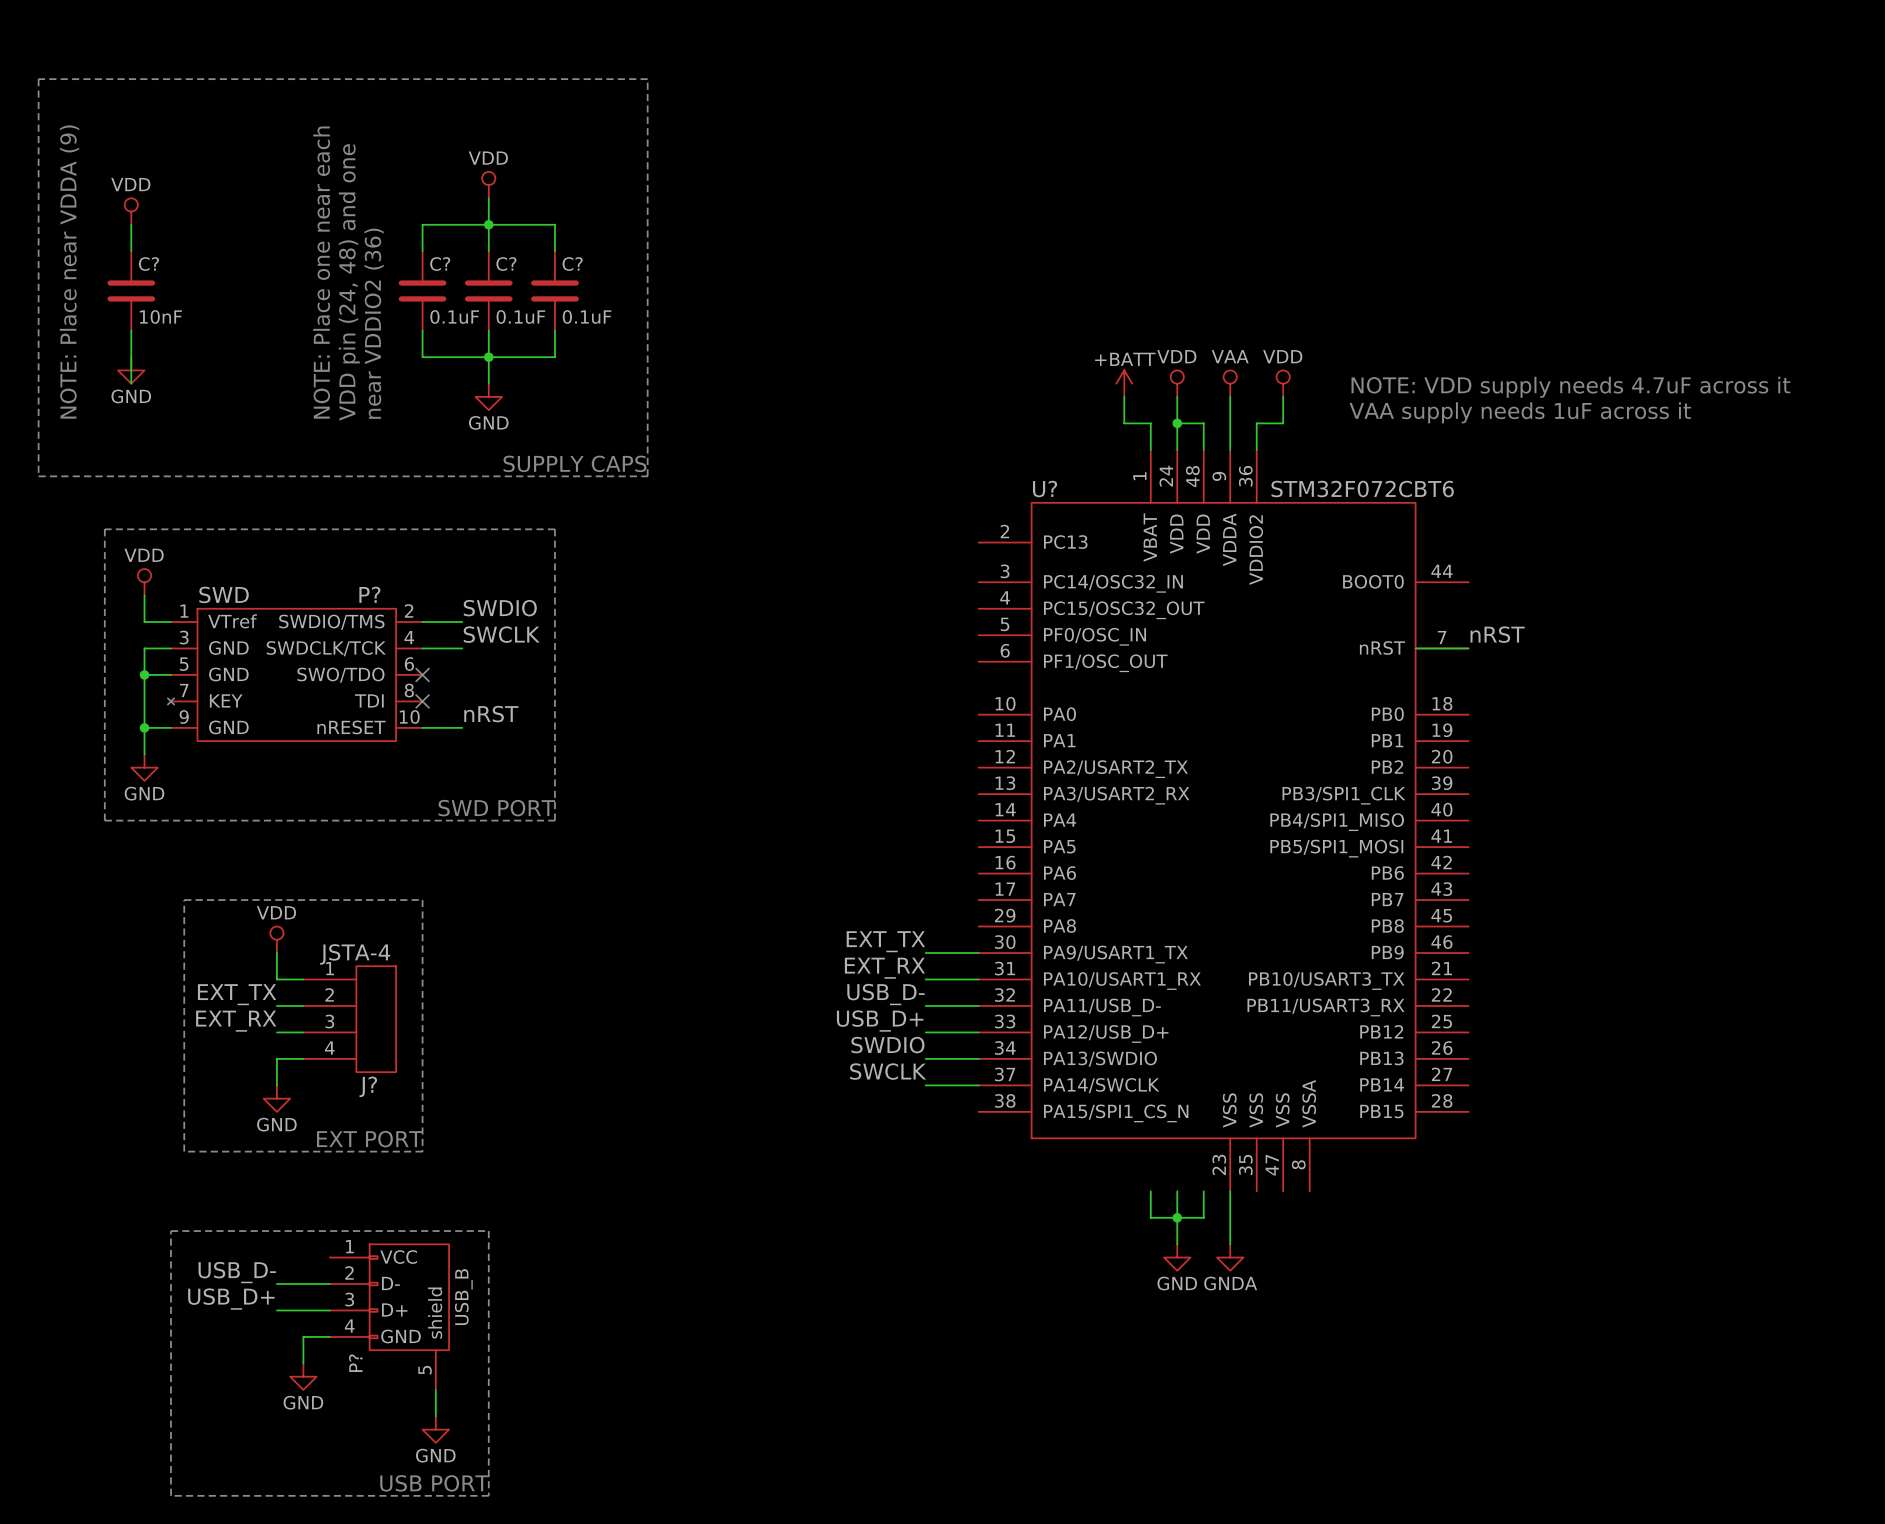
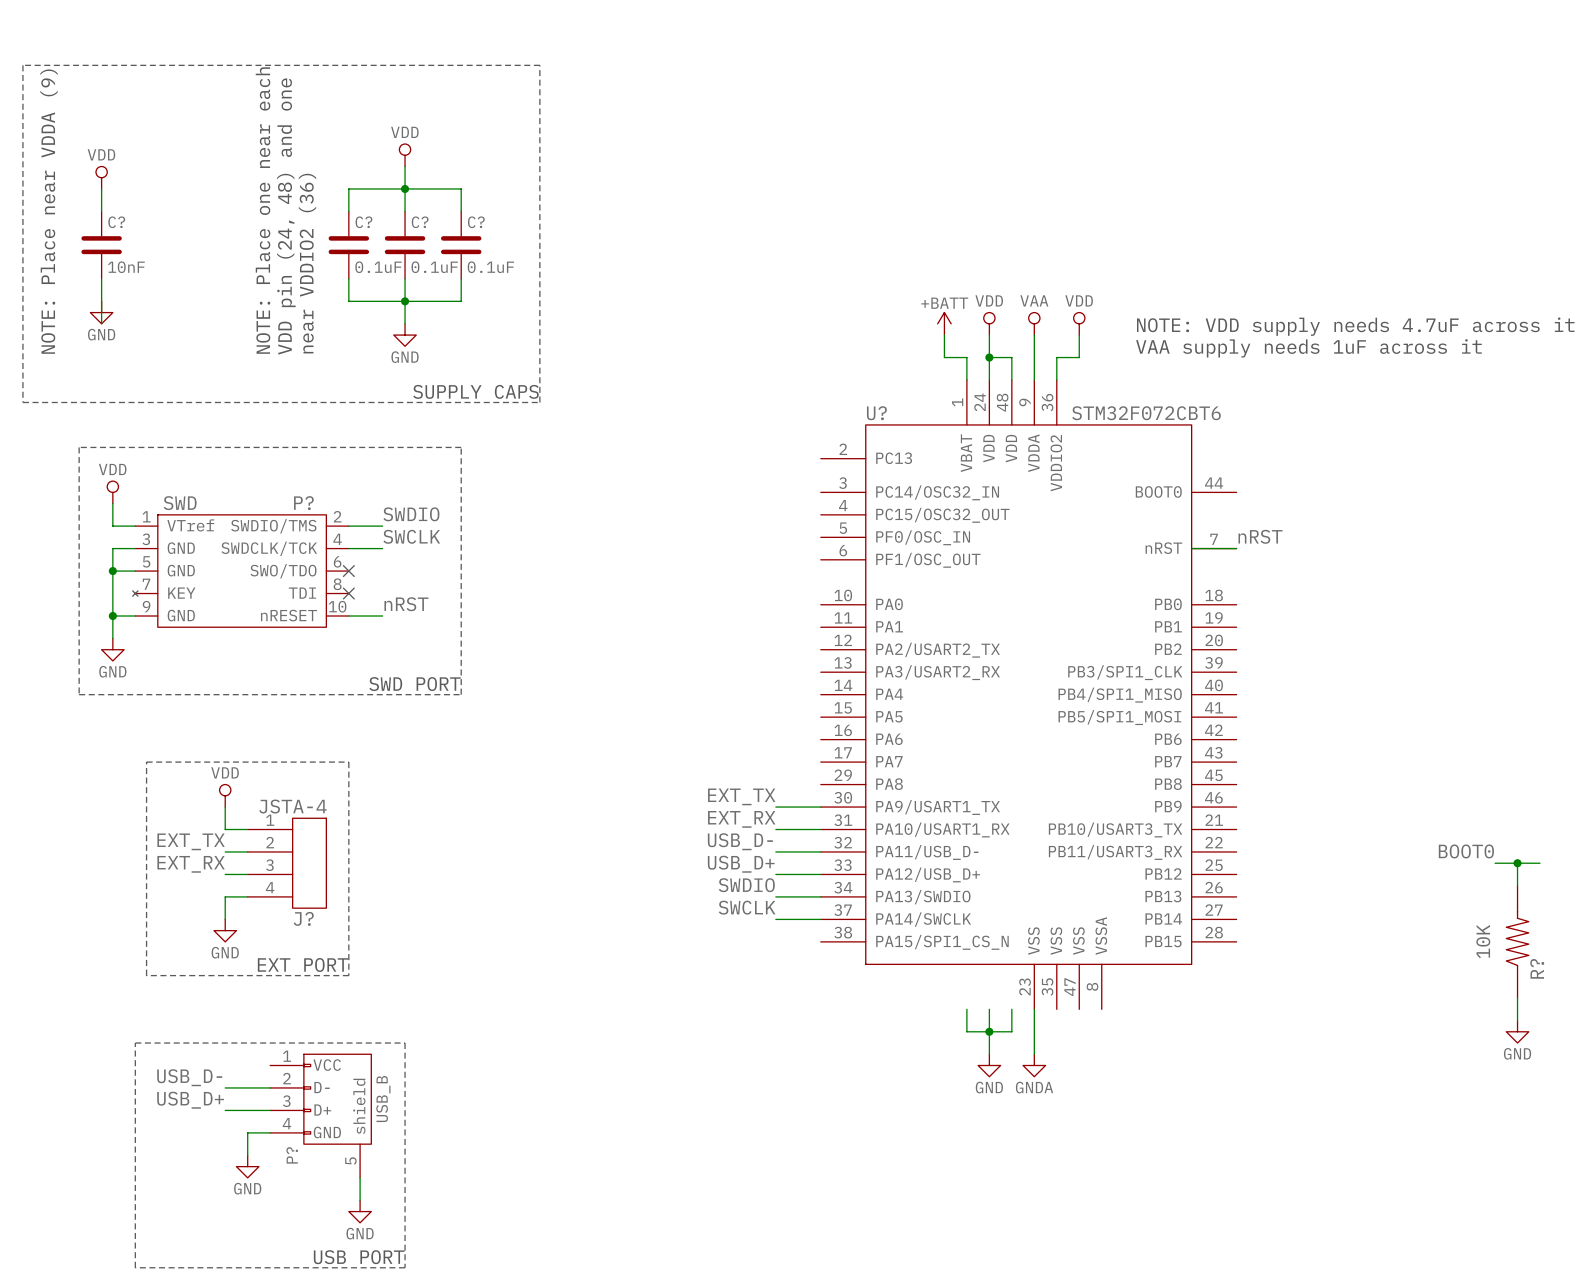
label: none -> BOOT0 (1466, 851)
wire: none -> (1495, 863) (1540, 863)
wire: none -> (1517, 863) (1517, 885)
junction: none -> (1517, 863)
R?: none -> 10K (1517, 941)
wire: none -> (1517, 998) (1517, 1020)
power symbol: none -> GND (1517, 1031)

